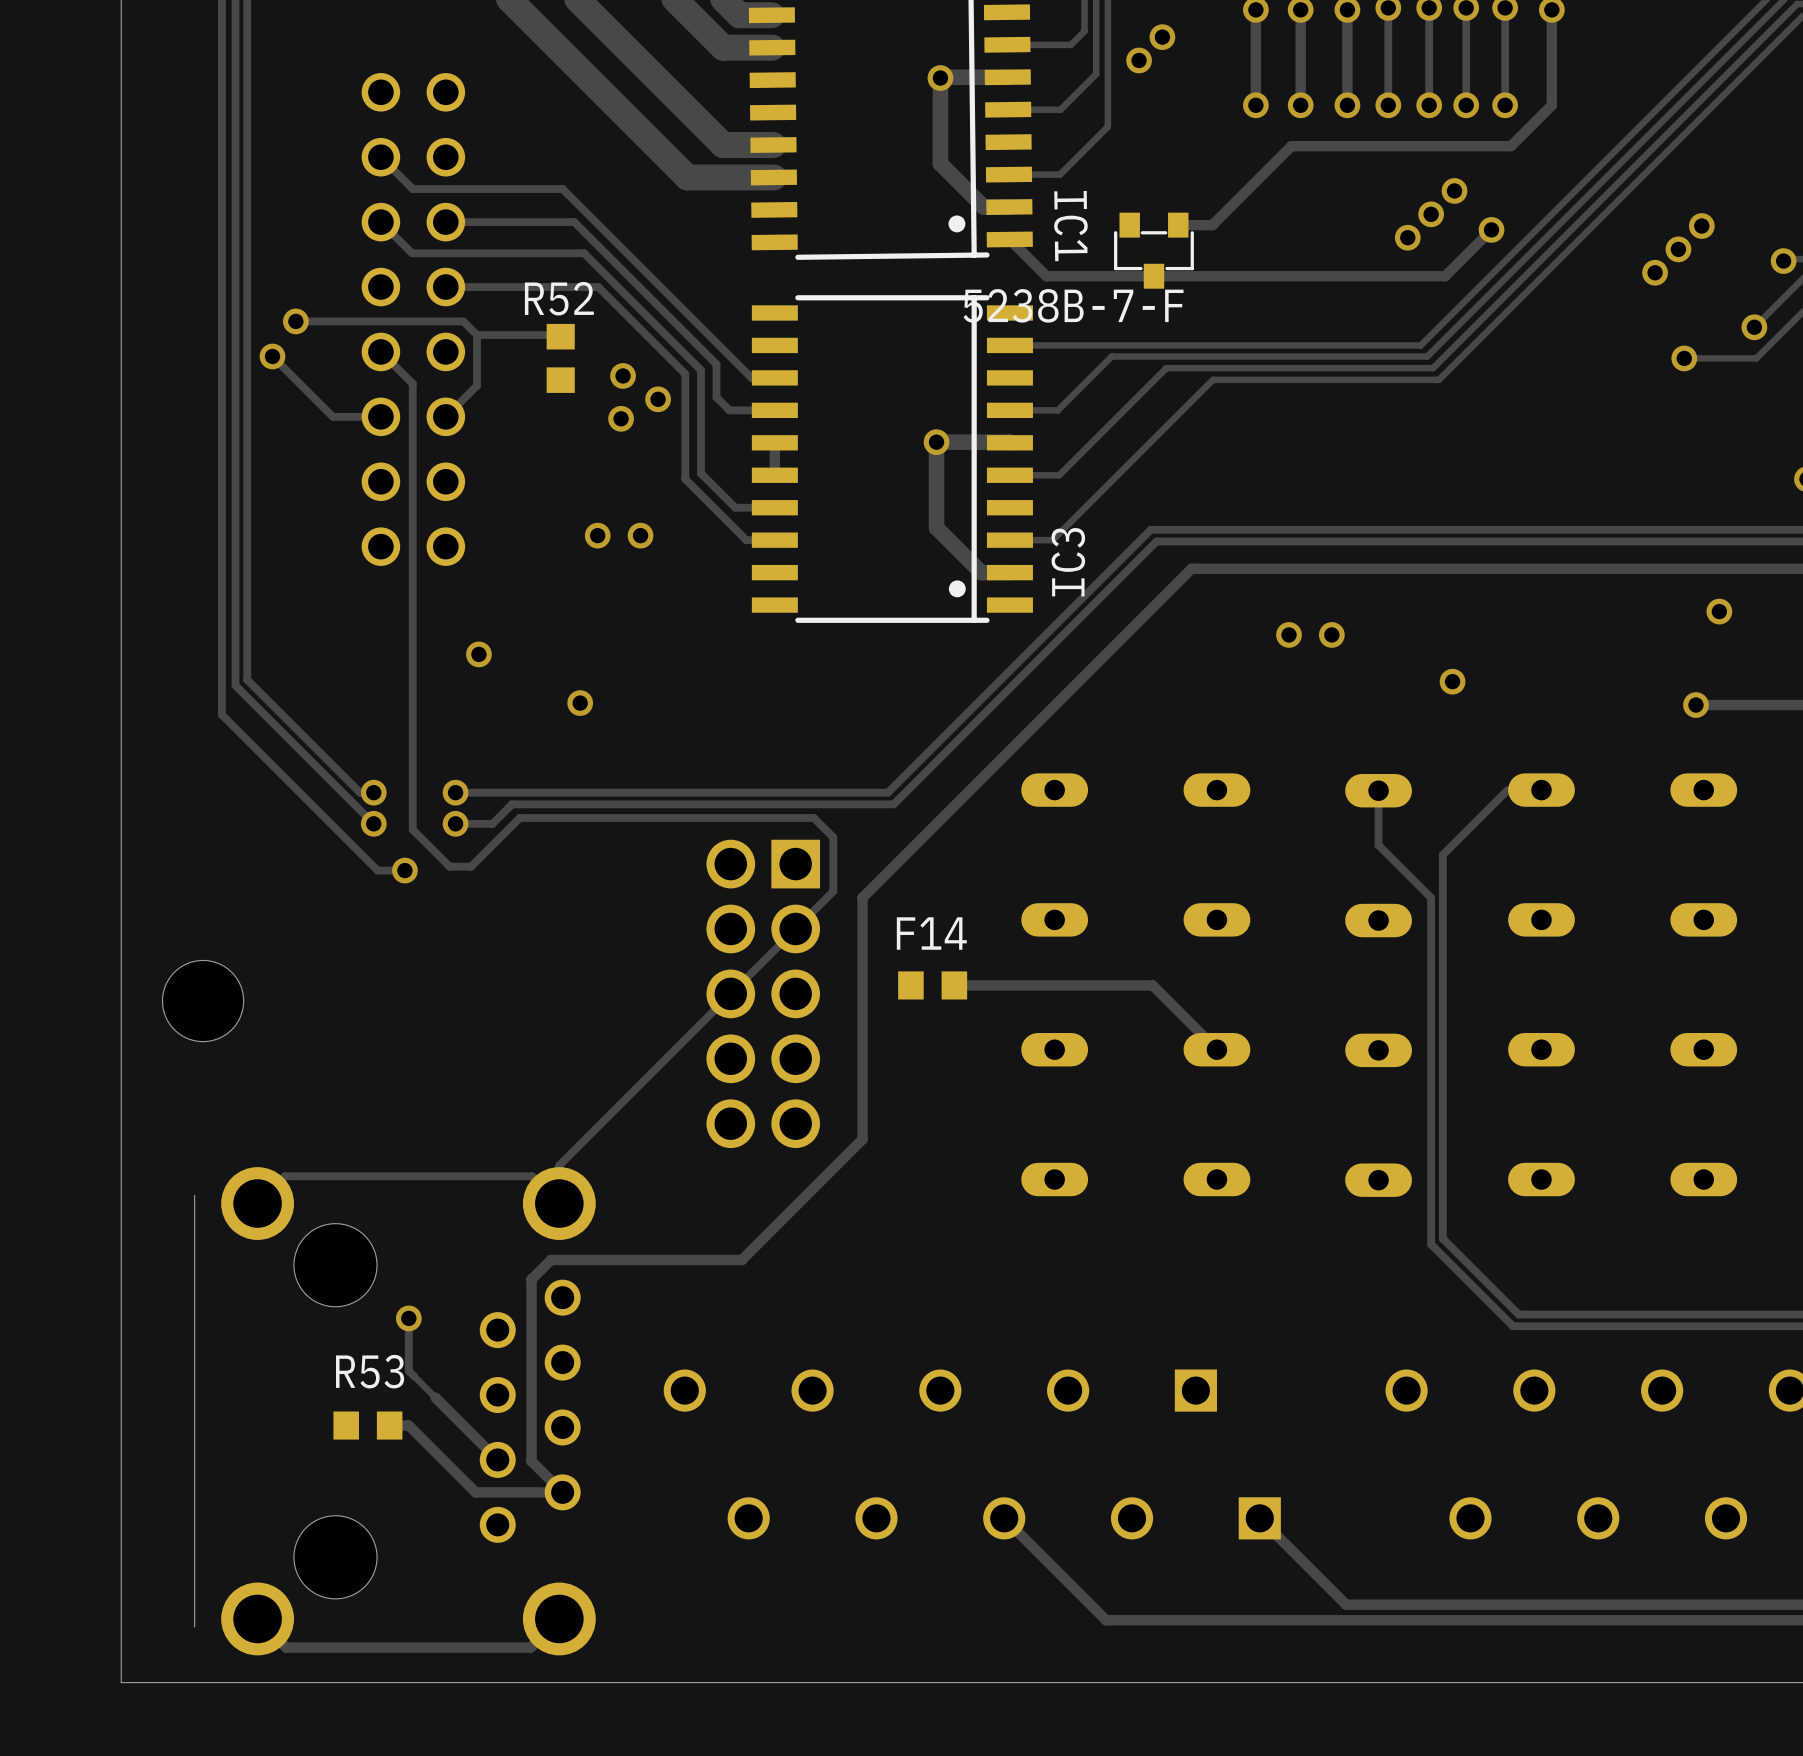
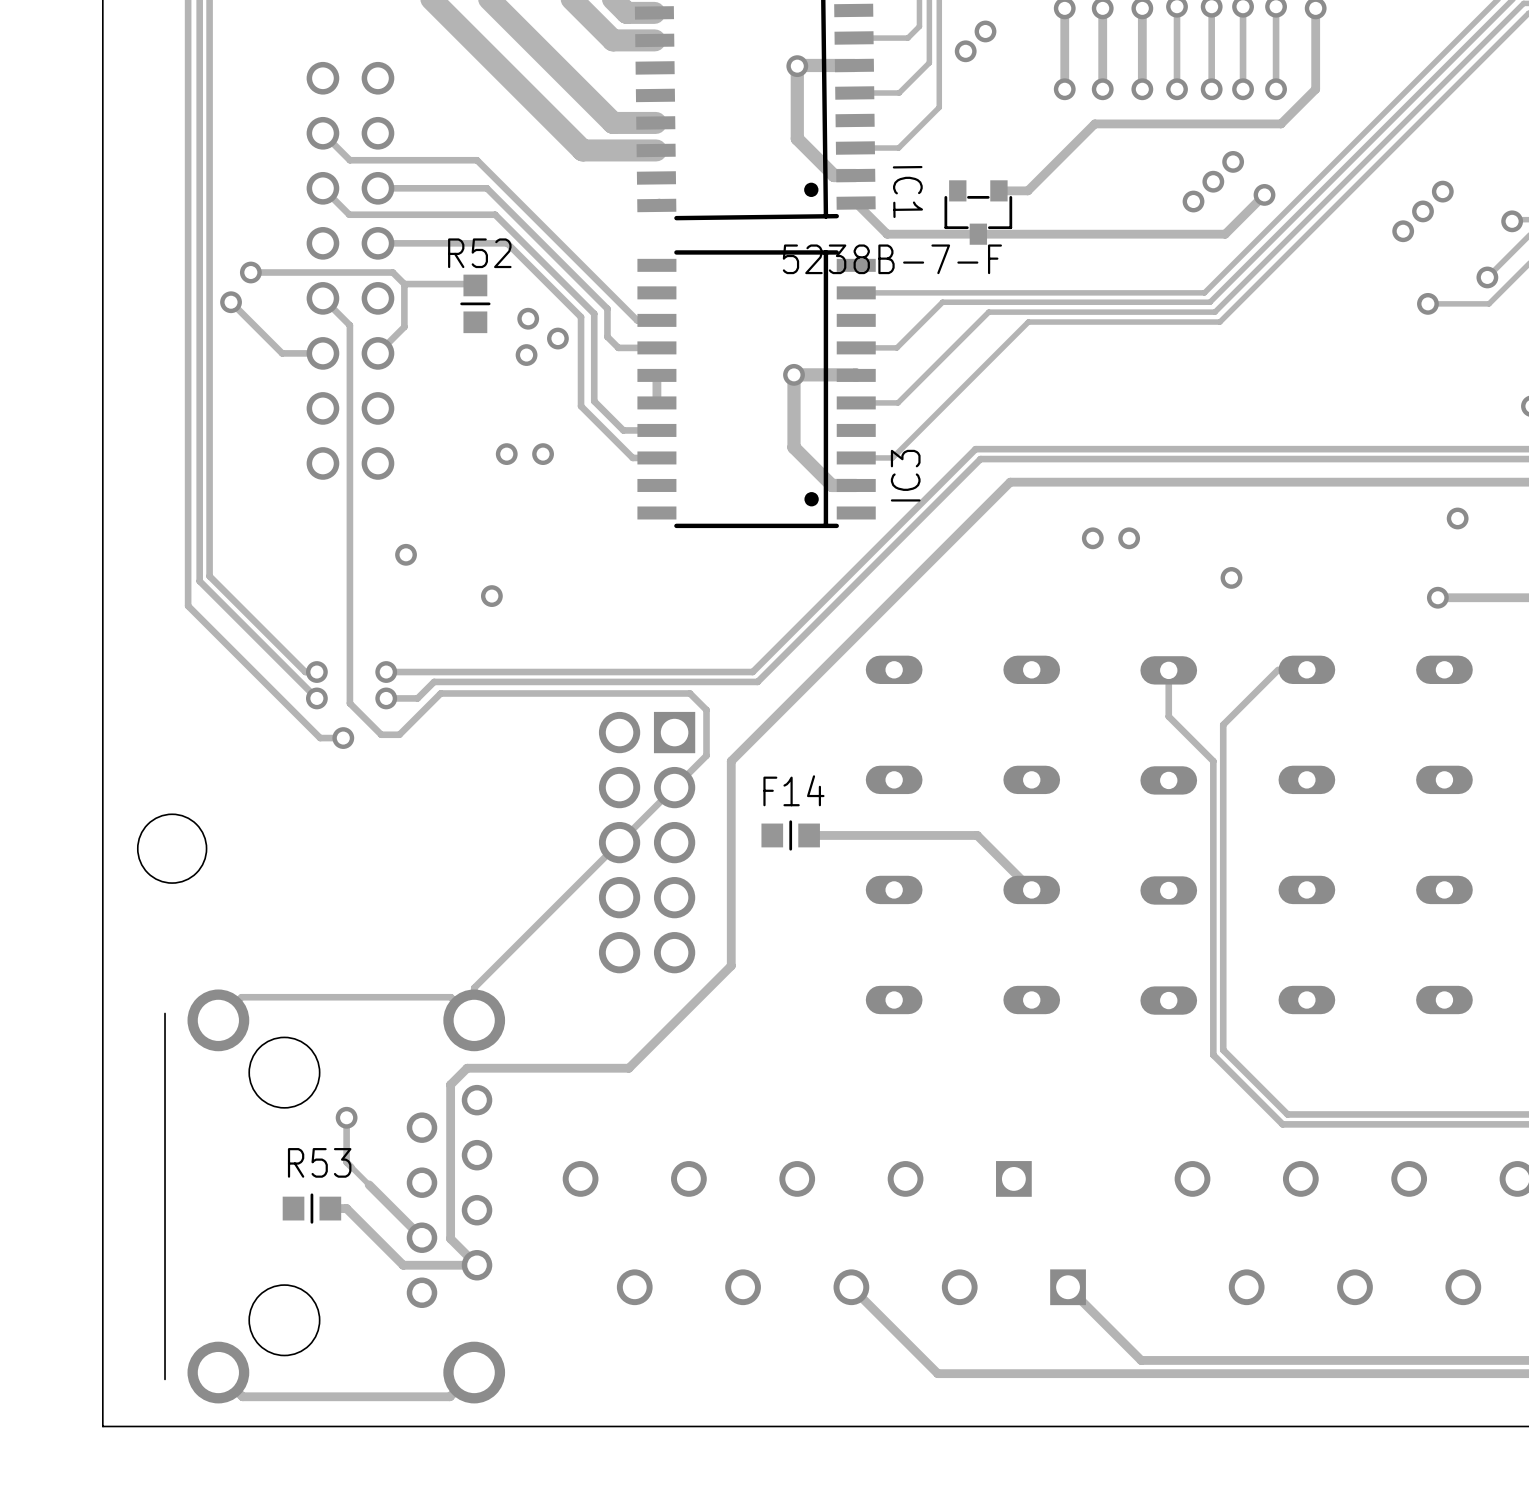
R52 footprint: [546, 323, 575, 393] -> [460, 274, 491, 334]
F14 footprint: [898, 971, 968, 1000] -> [761, 820, 820, 851]
R53 footprint: [333, 1411, 403, 1440] -> [282, 1193, 342, 1224]

